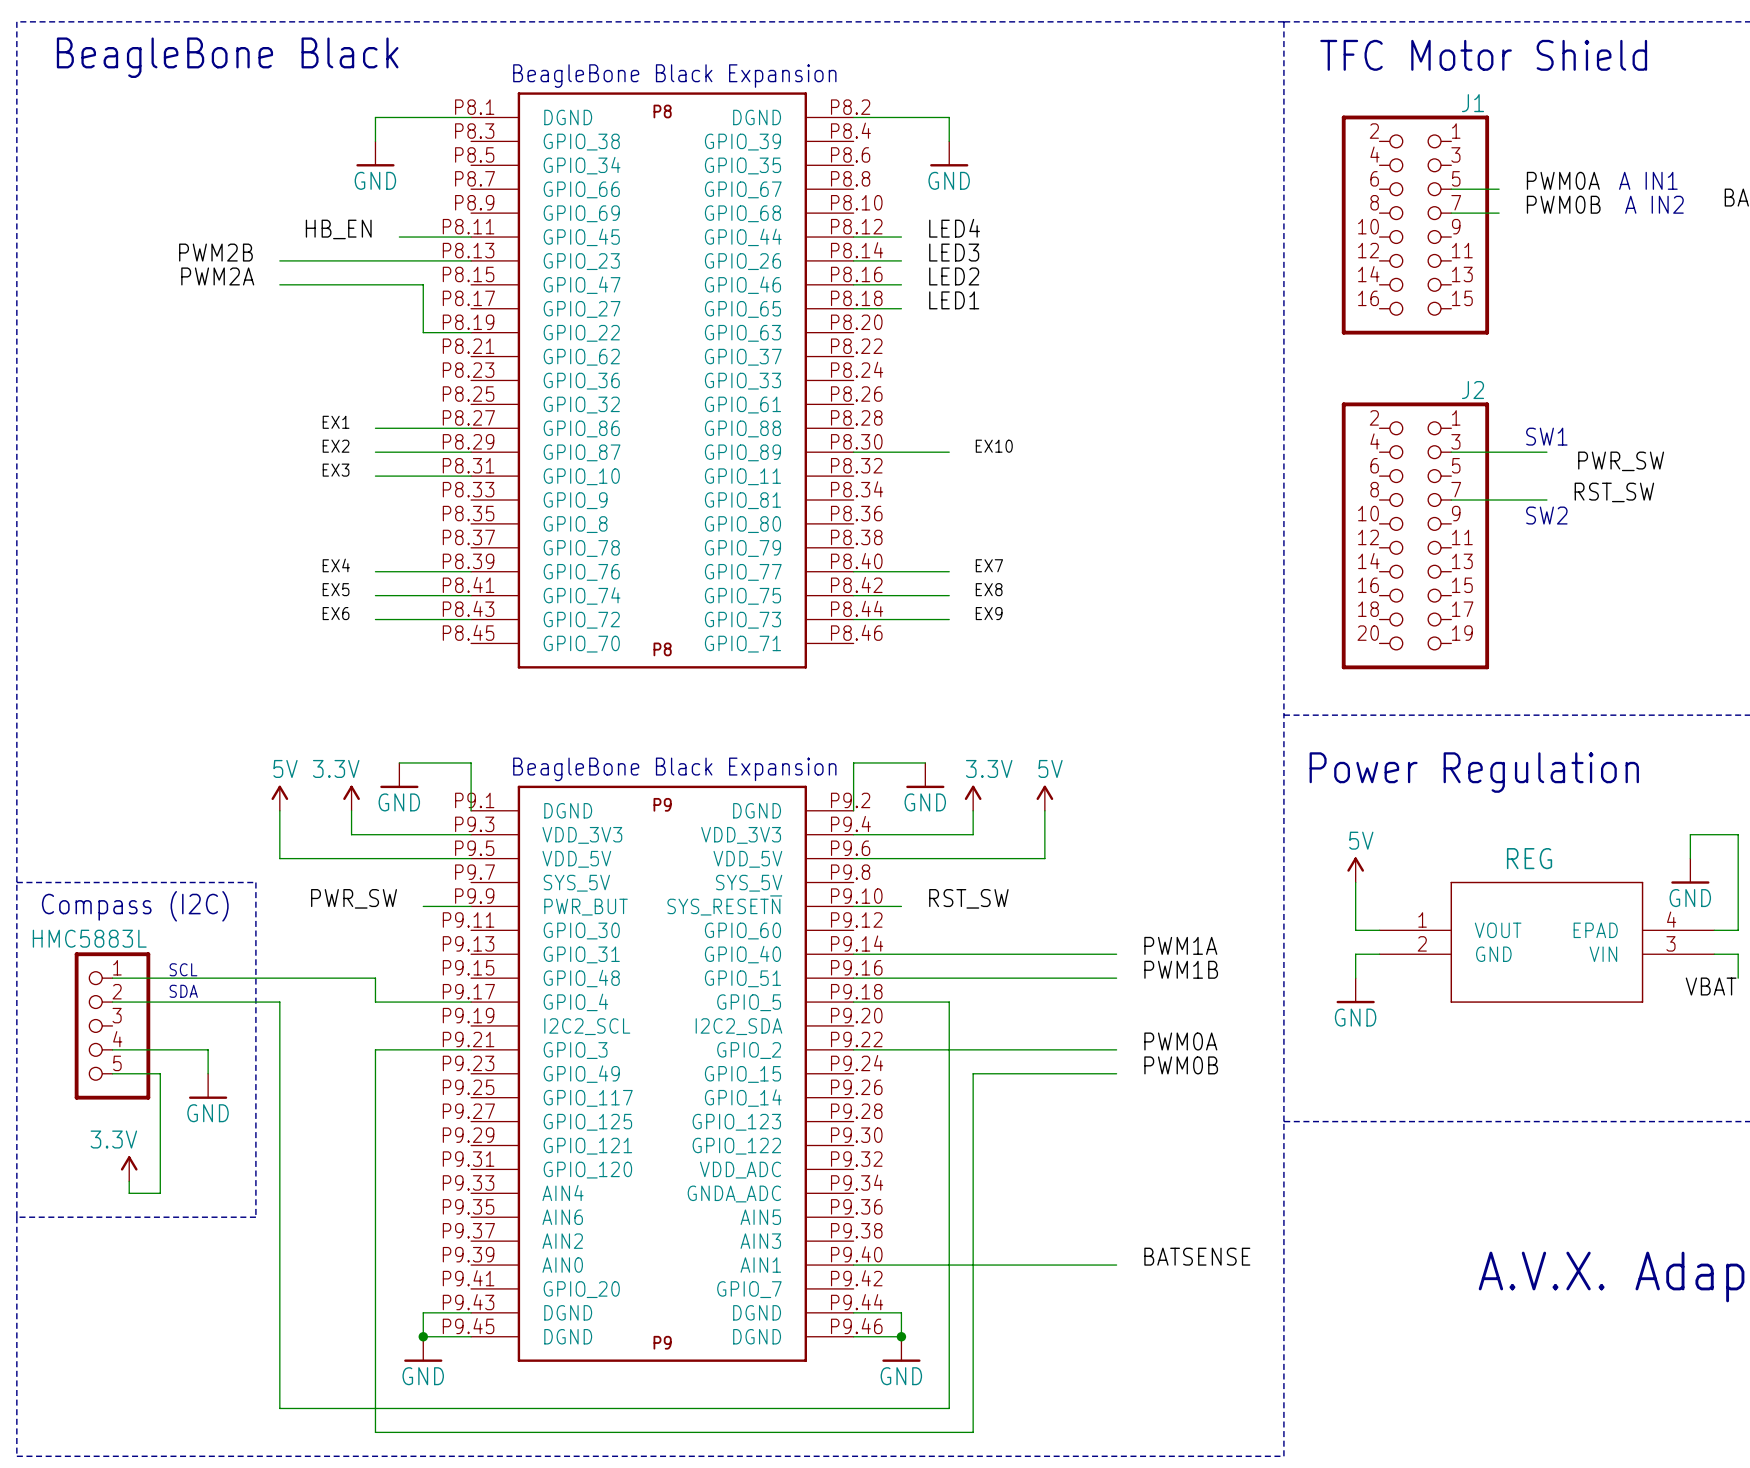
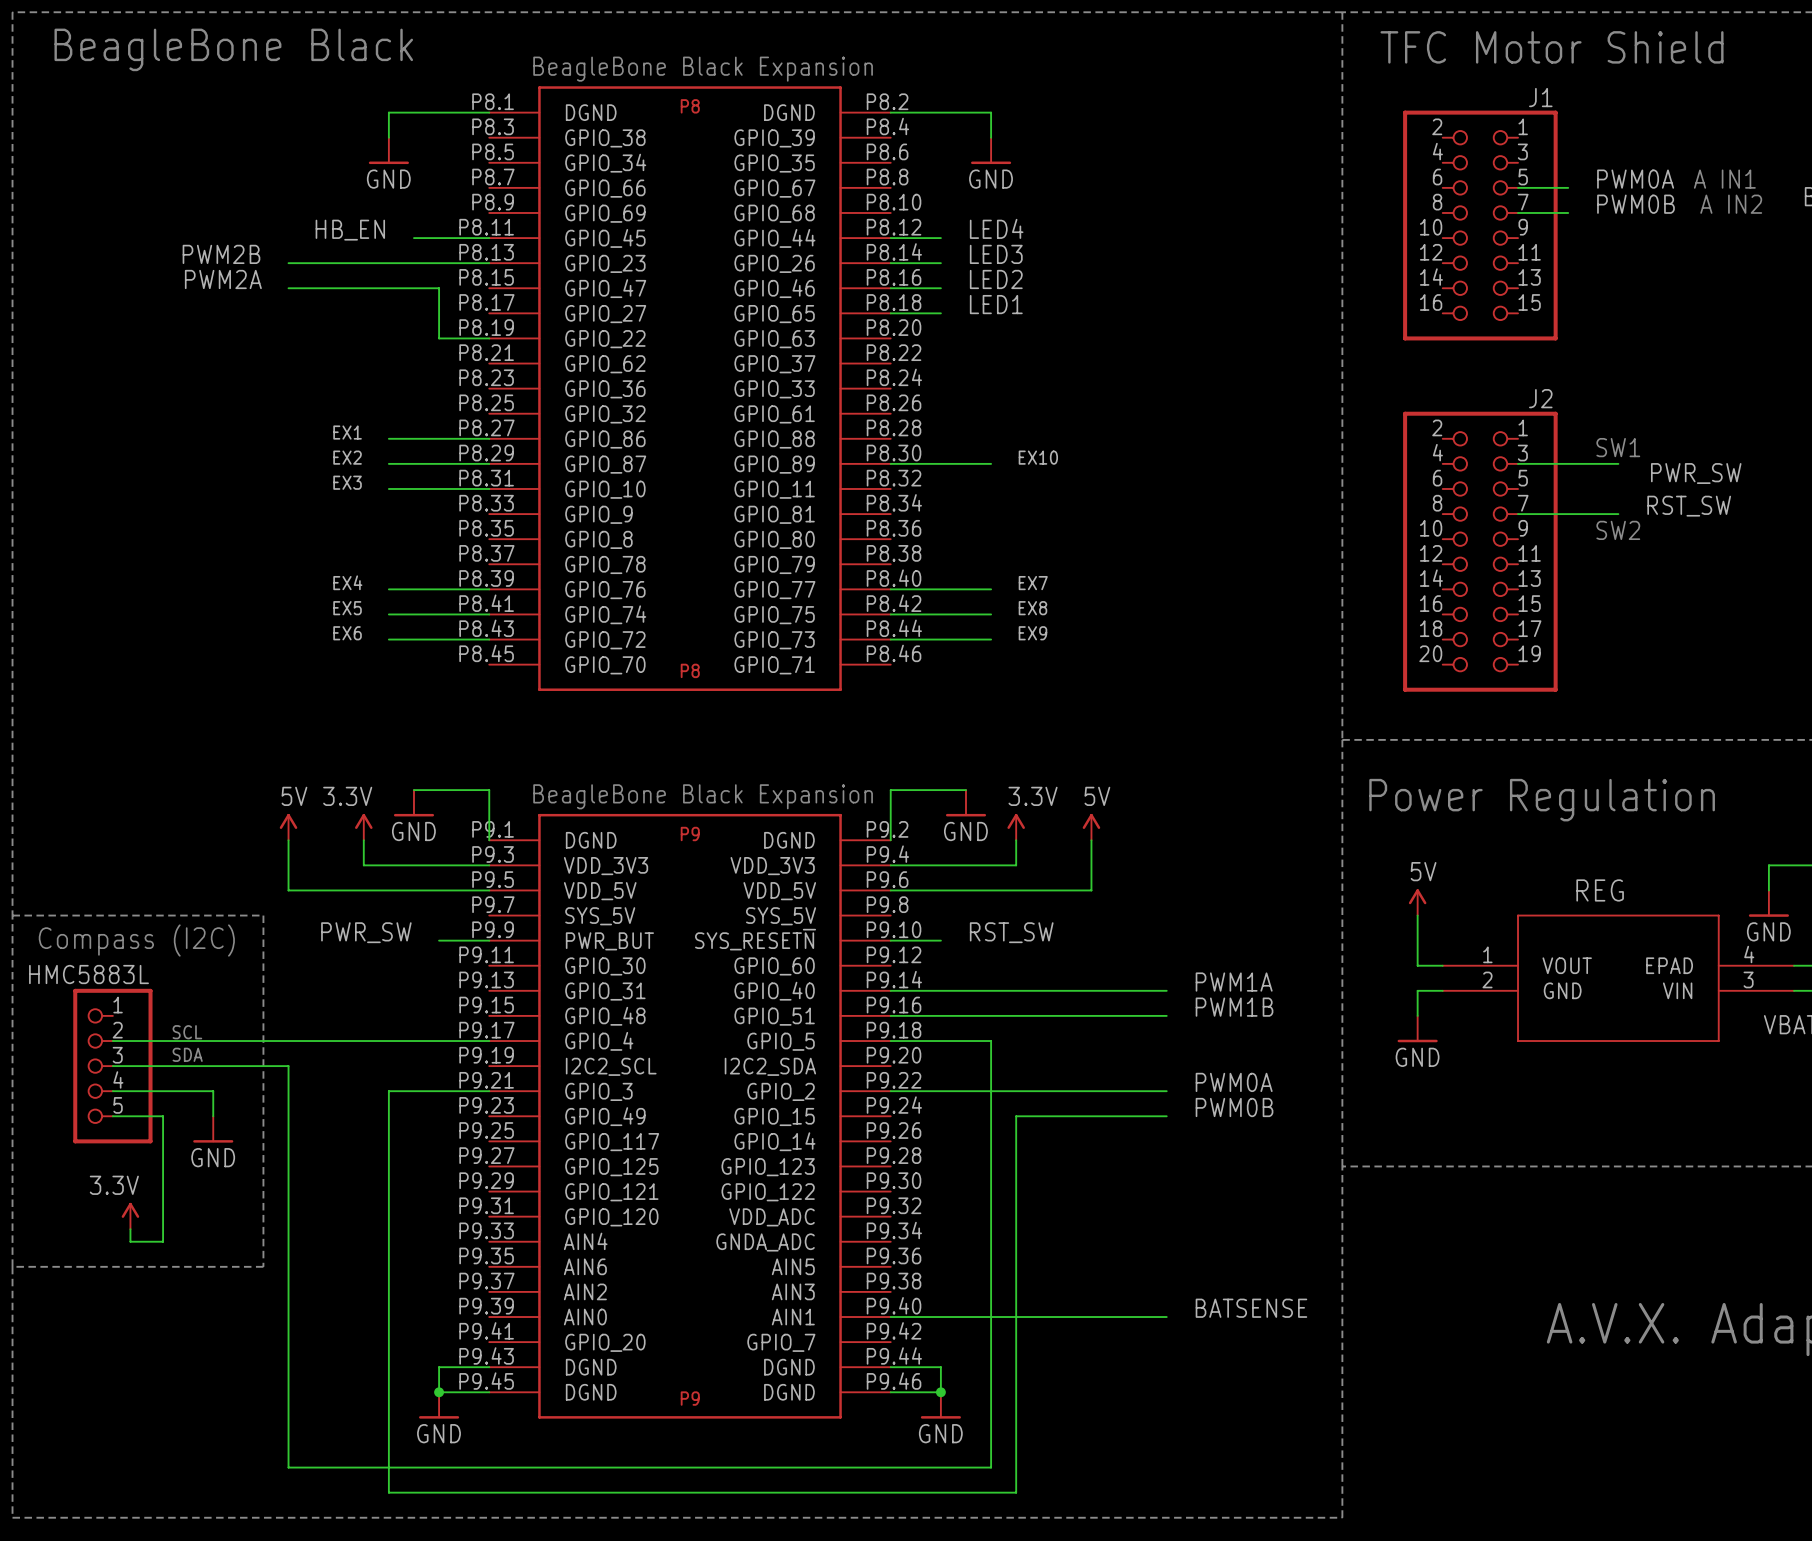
text: SCL (183, 969) -> none
wire: (112, 978) (375, 978) (375, 1002) -> none
text: SDA (183, 991) -> SCL (187, 1032)
wire: (279, 1002) (279, 1025) -> (288, 1041) (388, 1041)
text: none -> SDA (187, 1054)
wire: none -> (112, 1066) (288, 1066)

